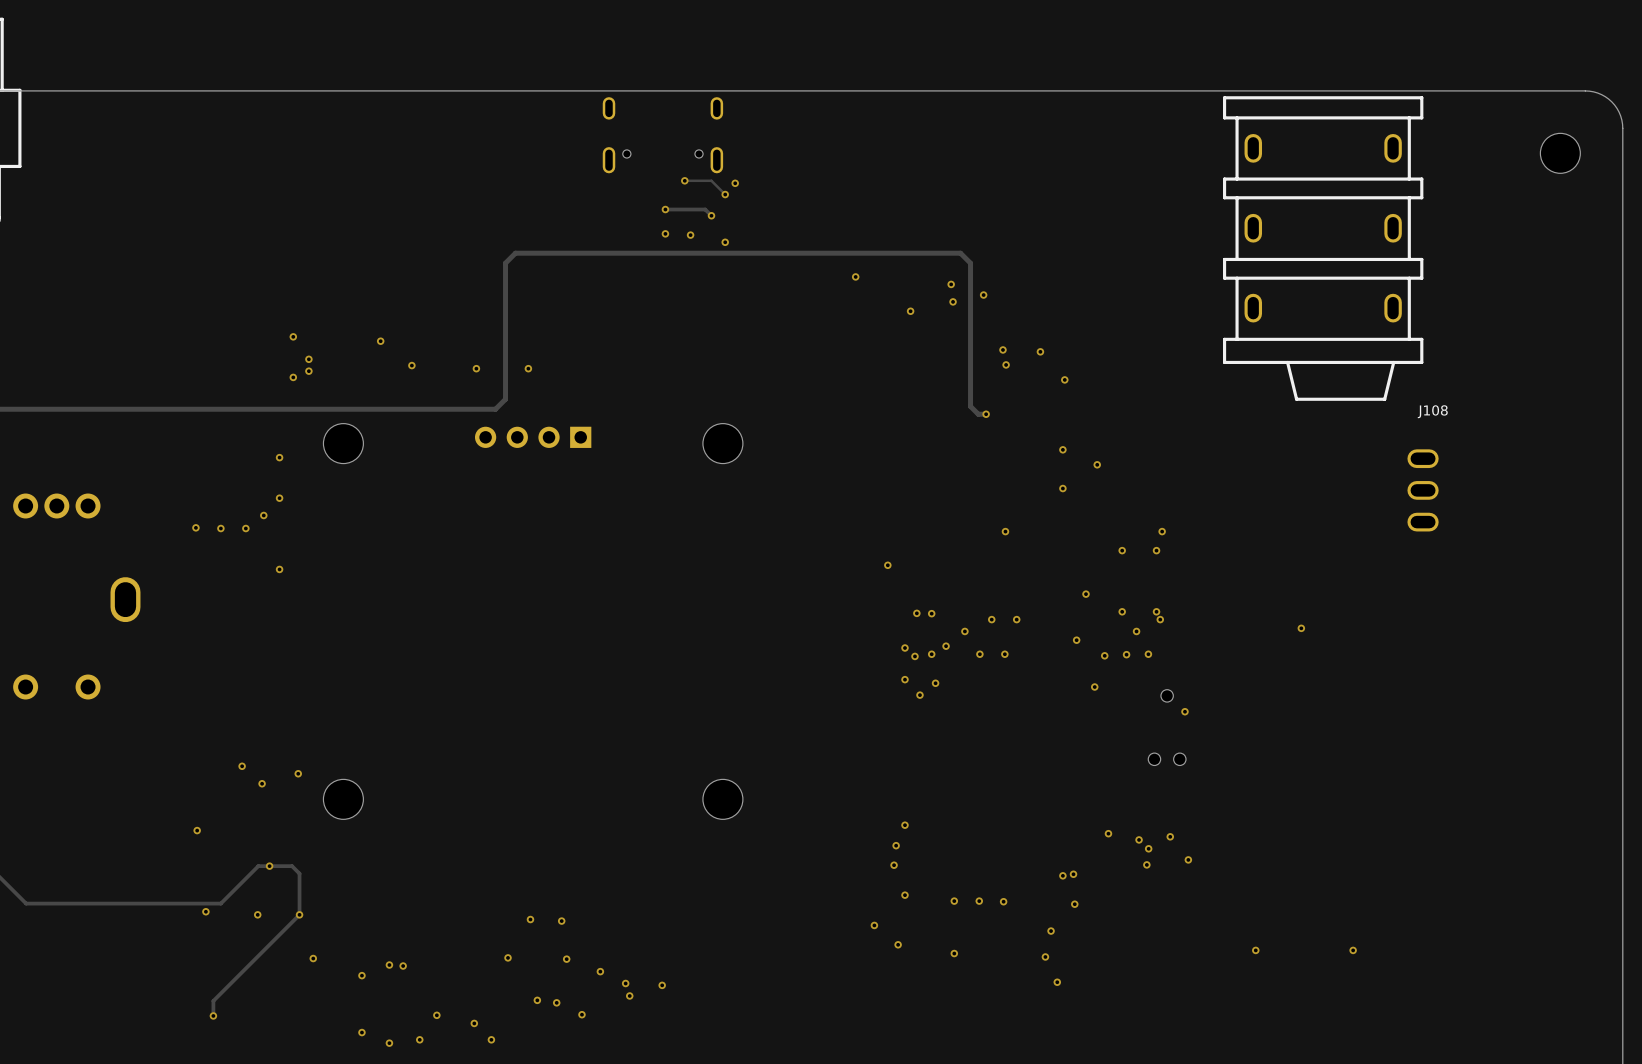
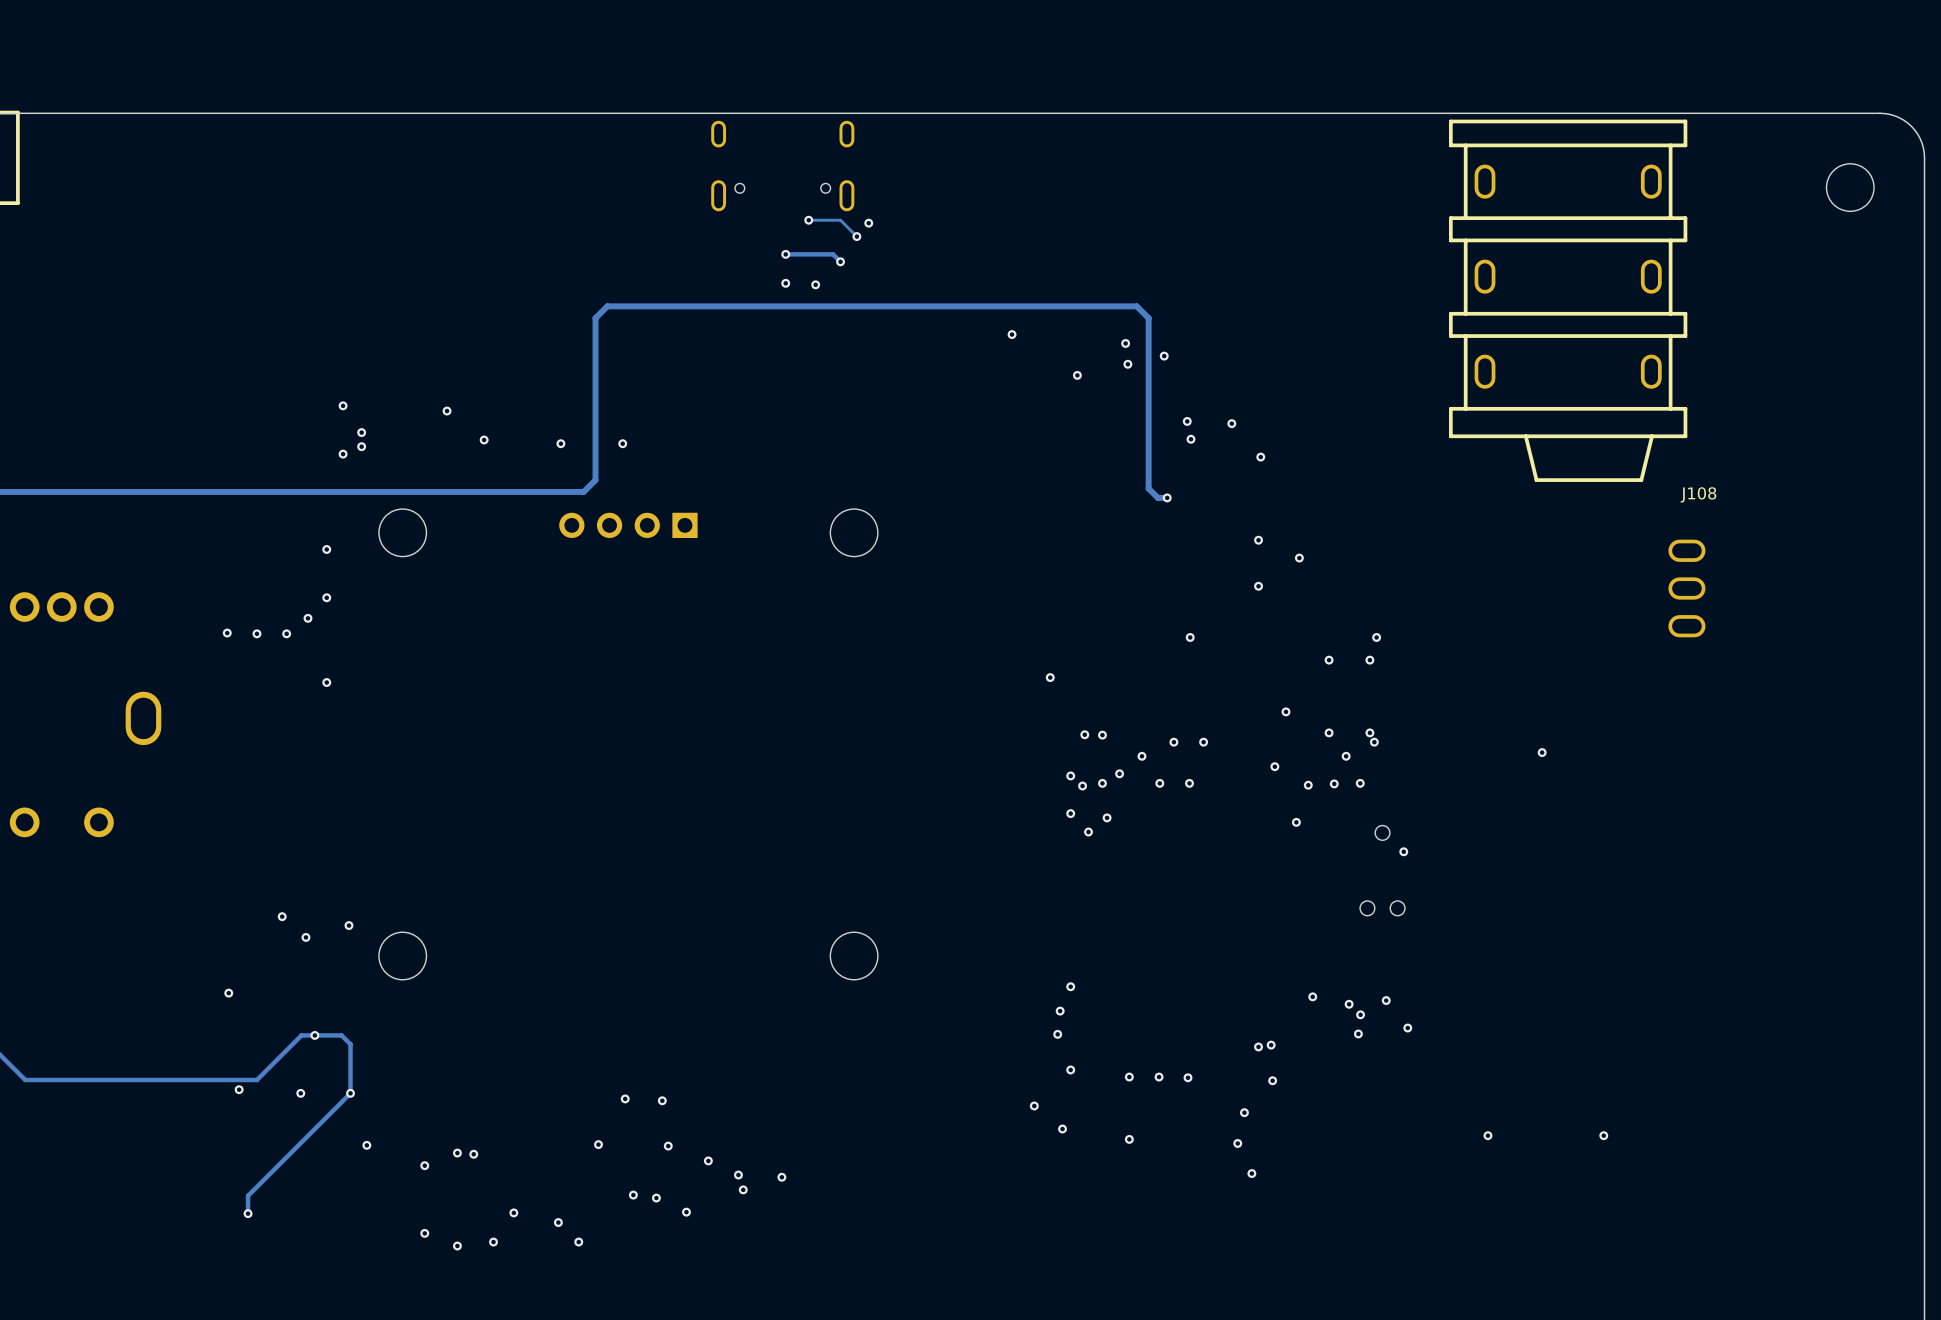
via: (725, 242) -> none

